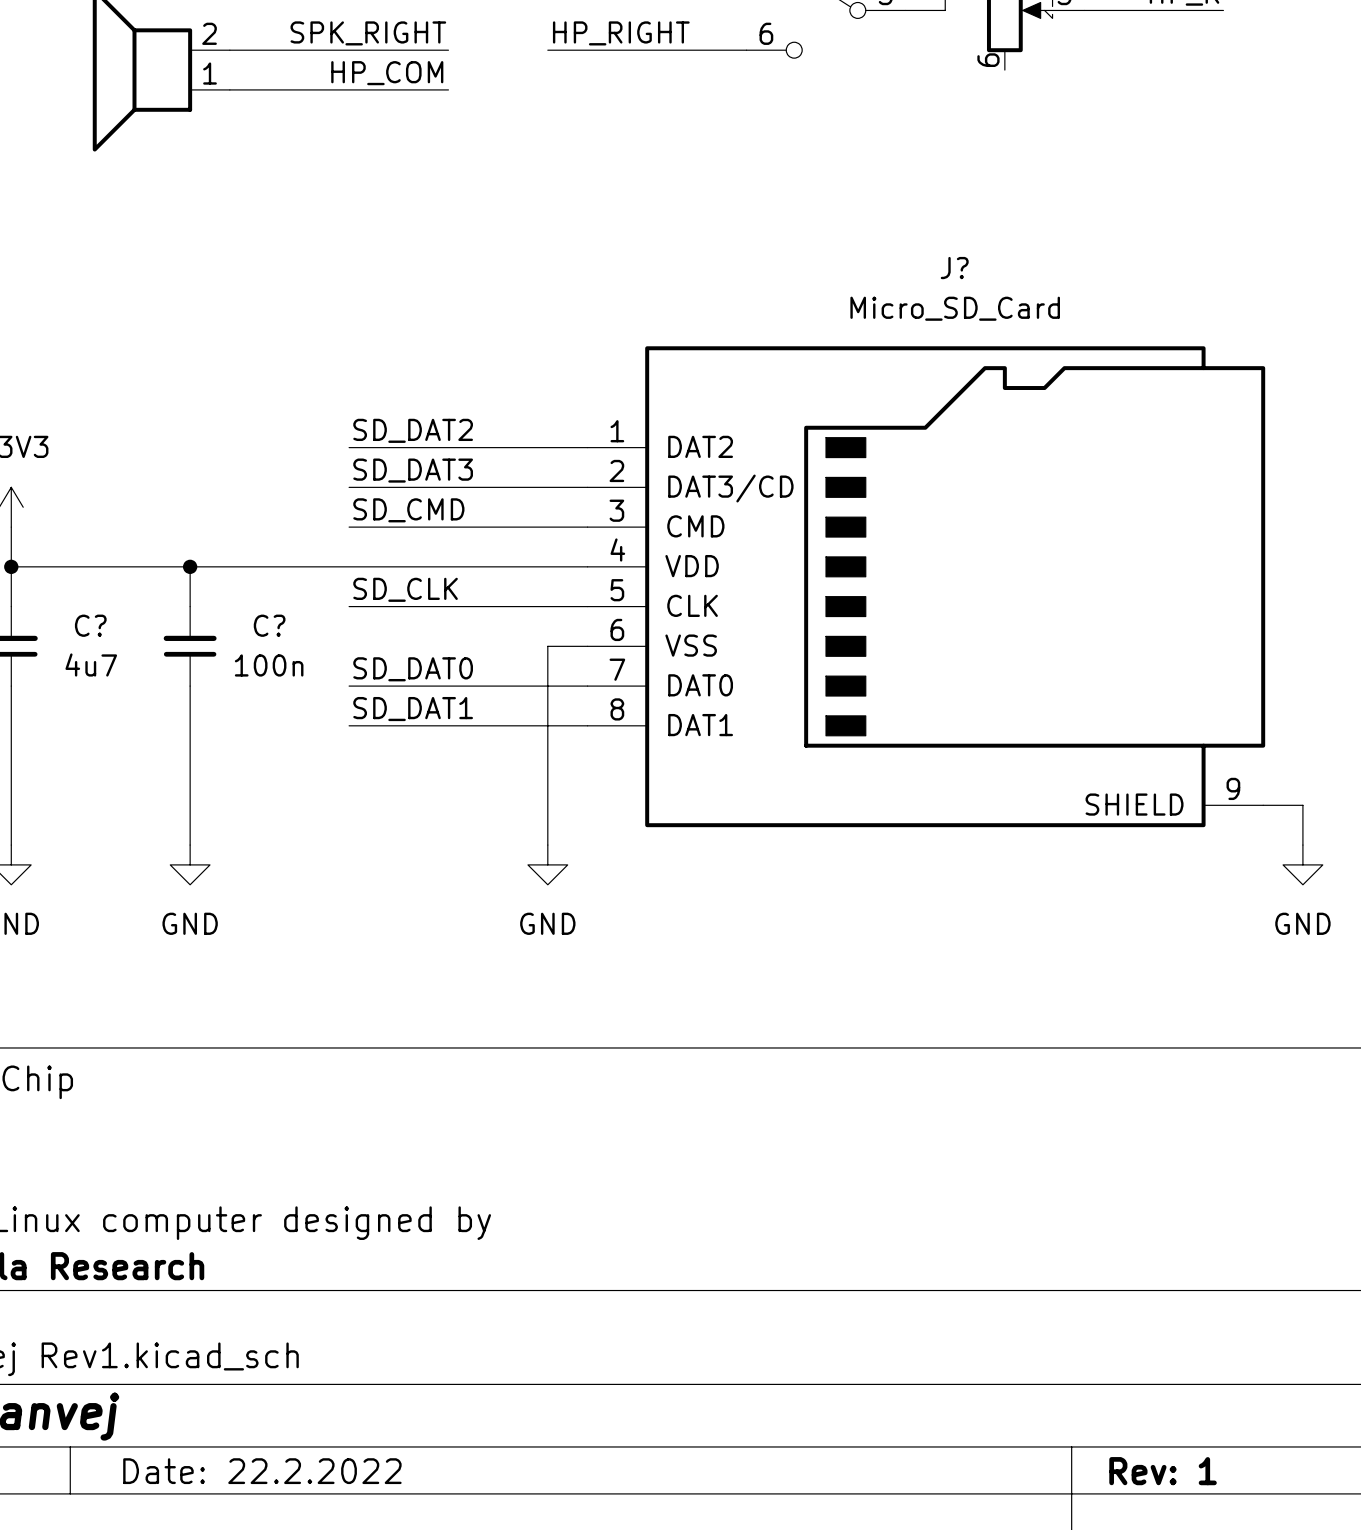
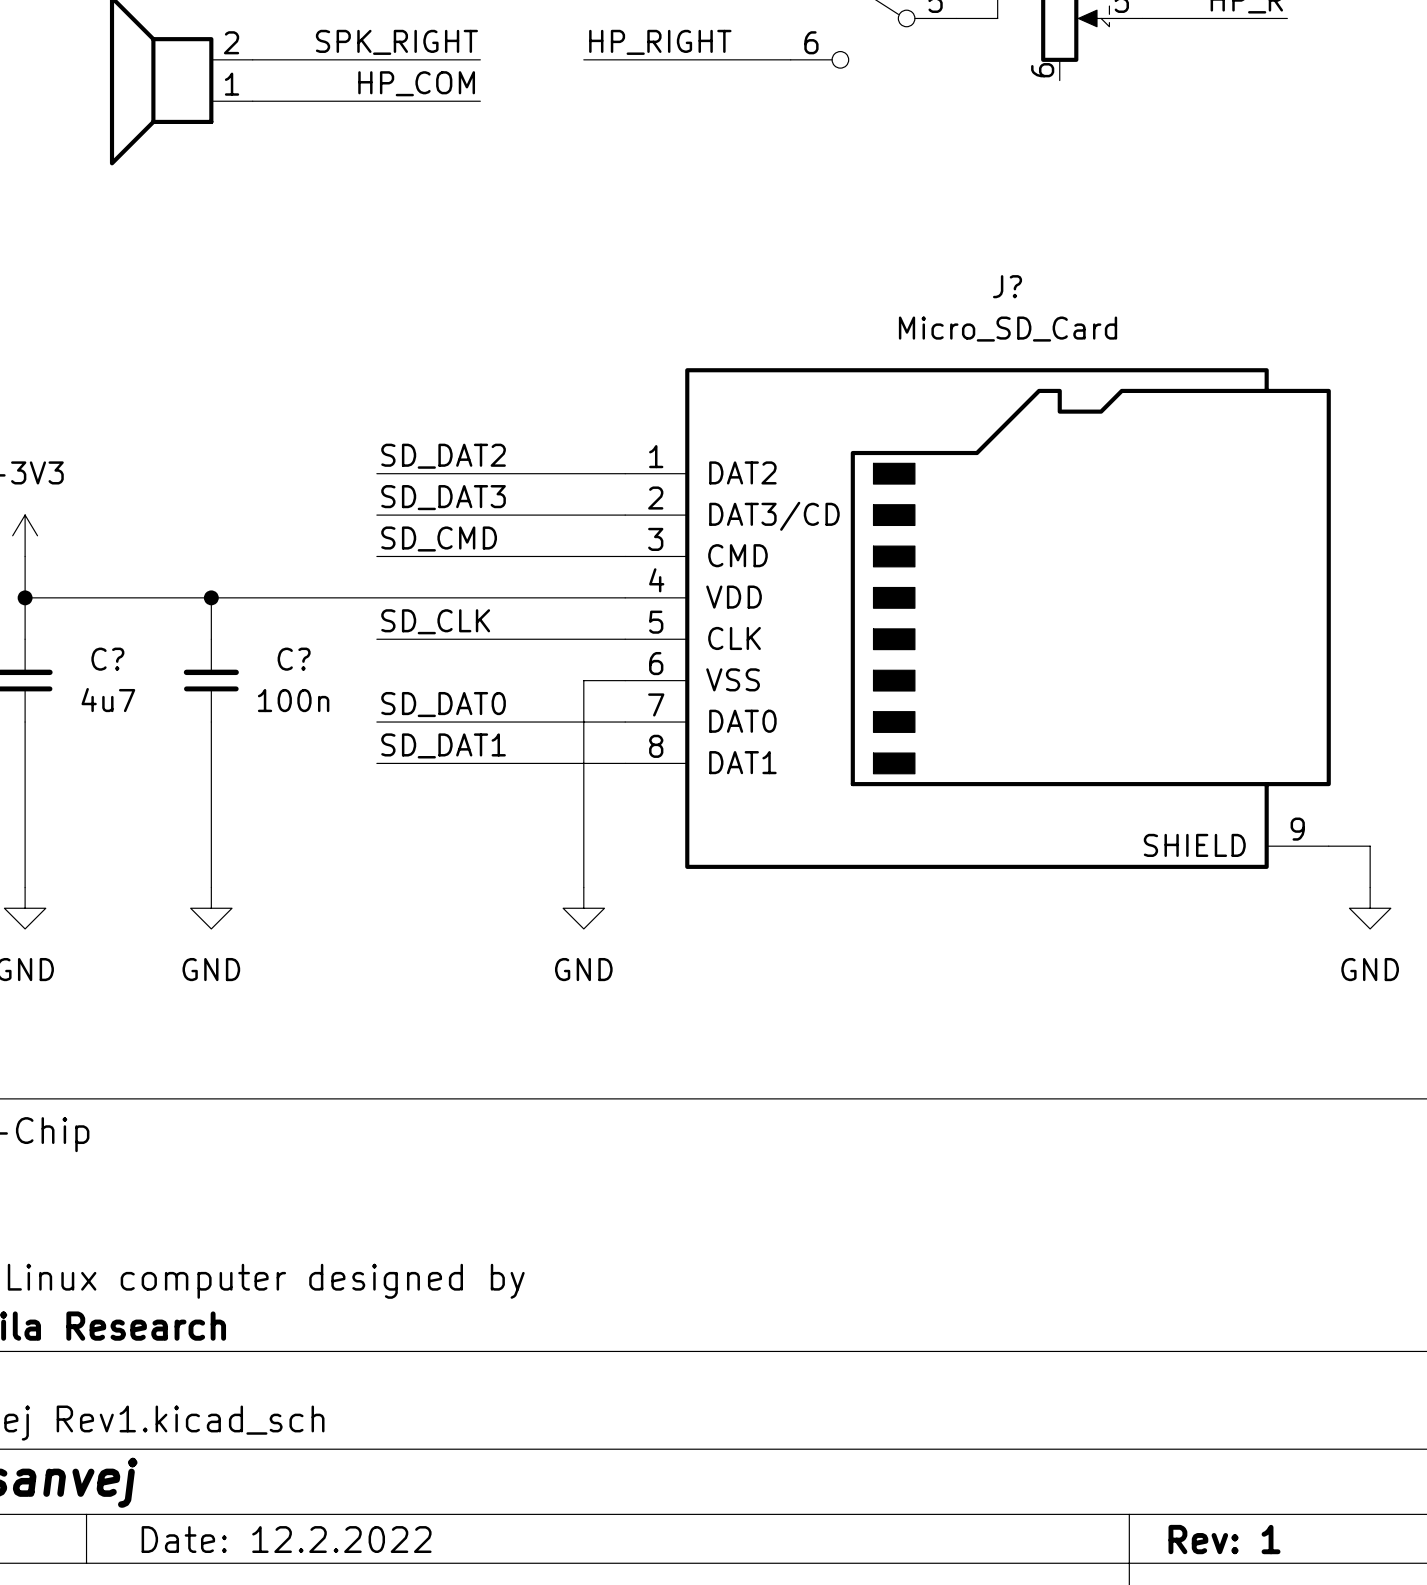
title block: Date: 22.2.2022 (262, 1471) -> Date: 12.2.2022 (286, 1539)

